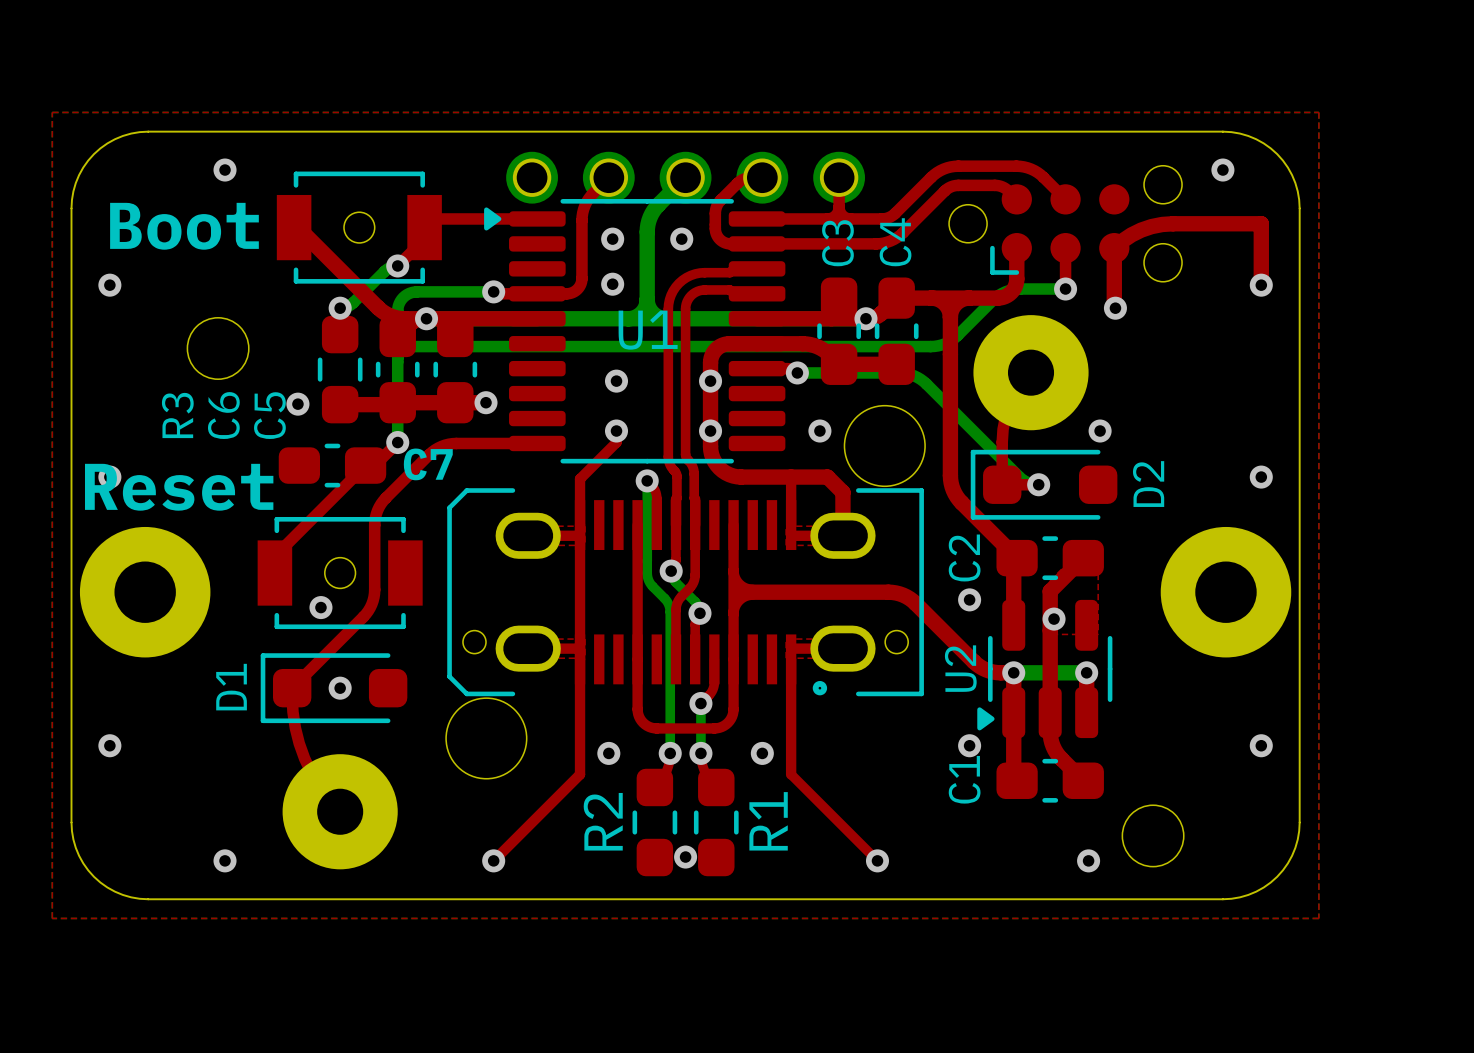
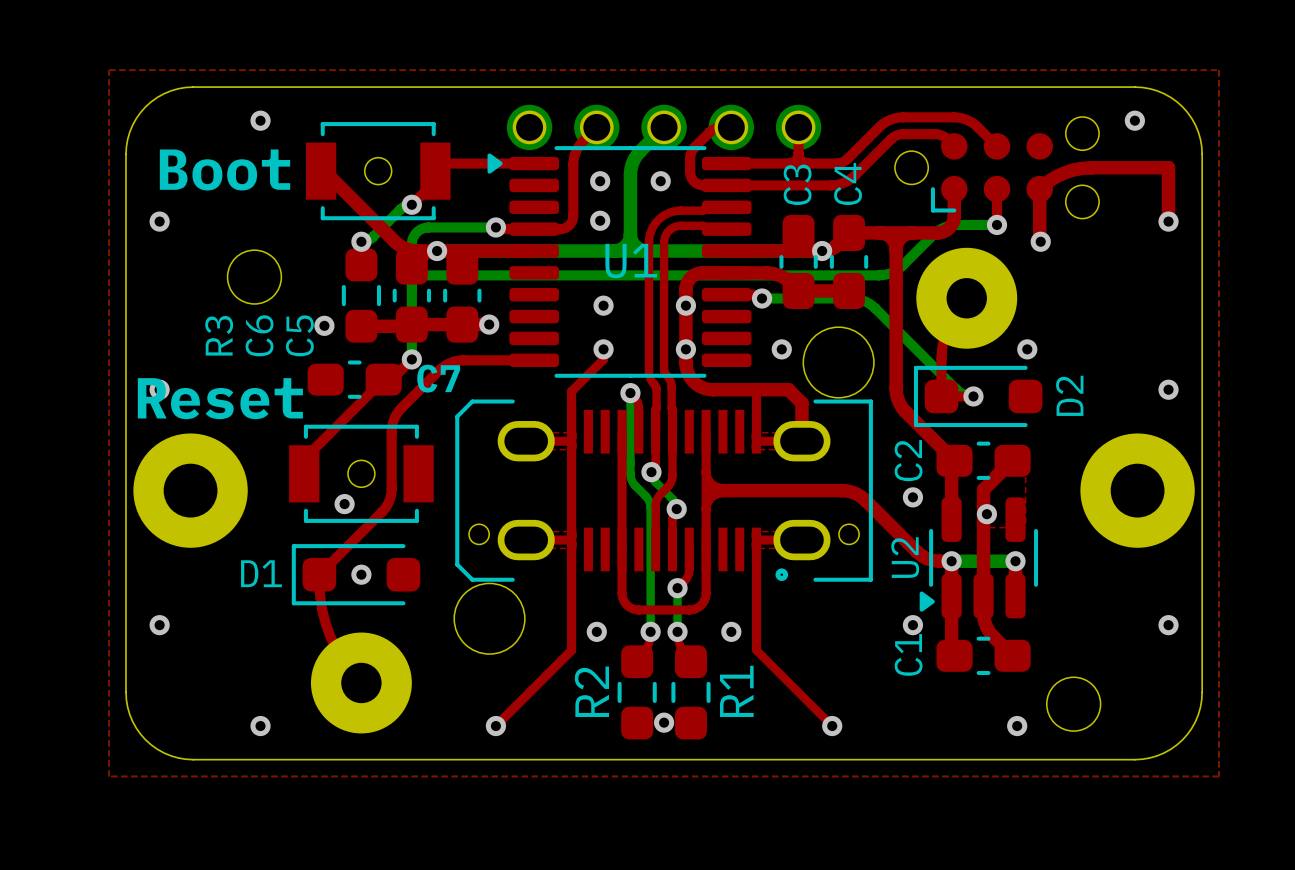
D1 name rotation: 0° (231, 687) -> 90° clockwise (261, 573)

